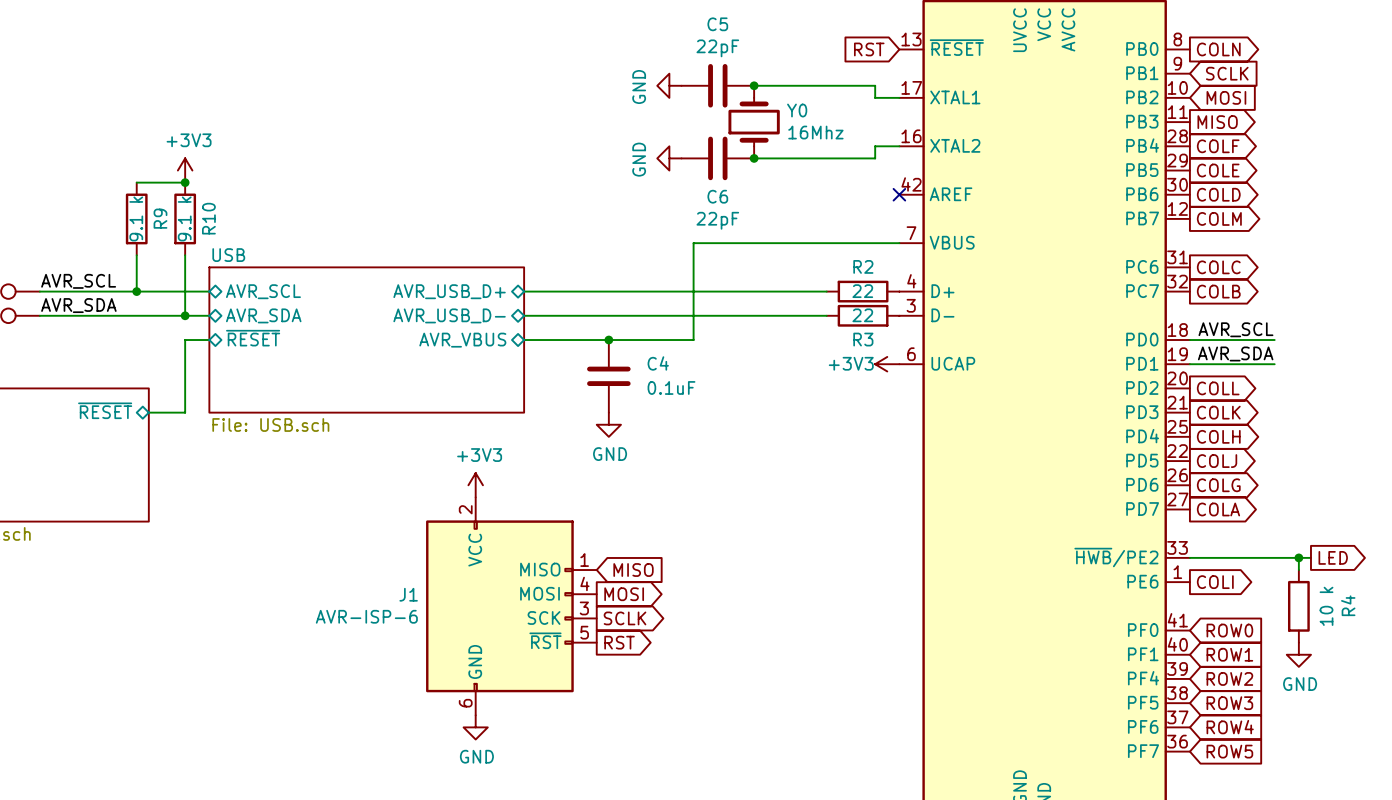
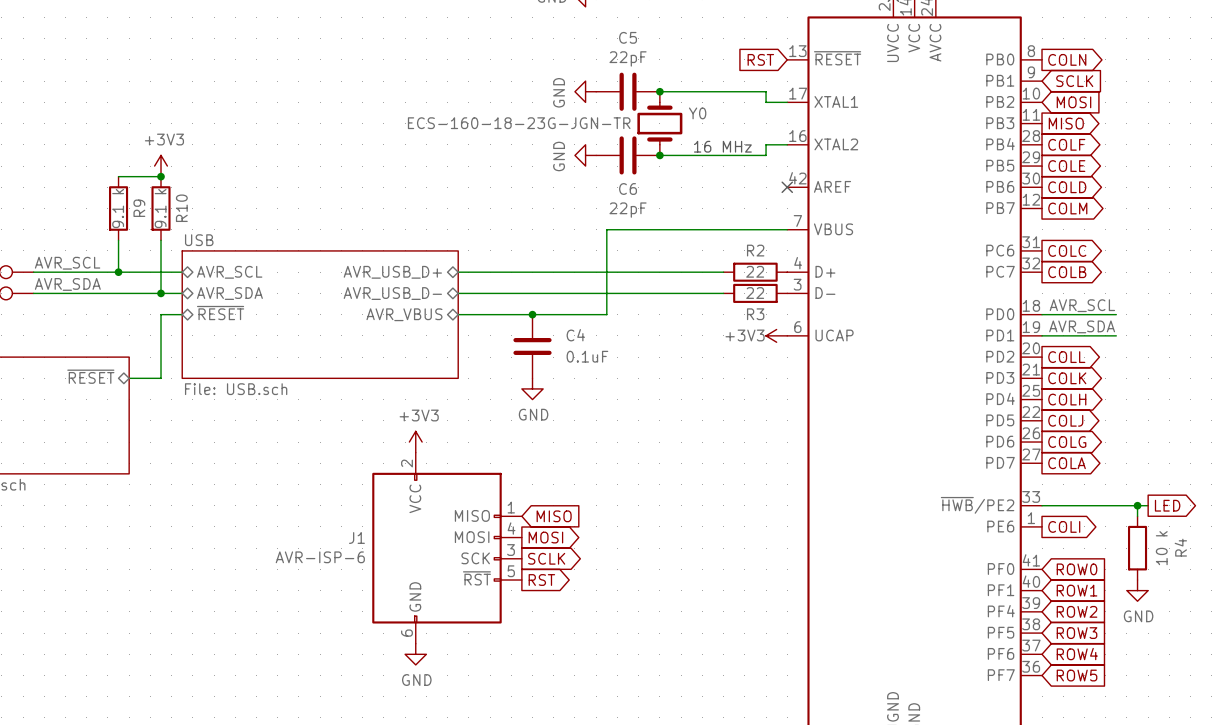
Y0 value: 16Mhz (815, 132) -> ECS-160-18-23G-JGN-TR (519, 123)
text: none -> 16 MHz (722, 146)

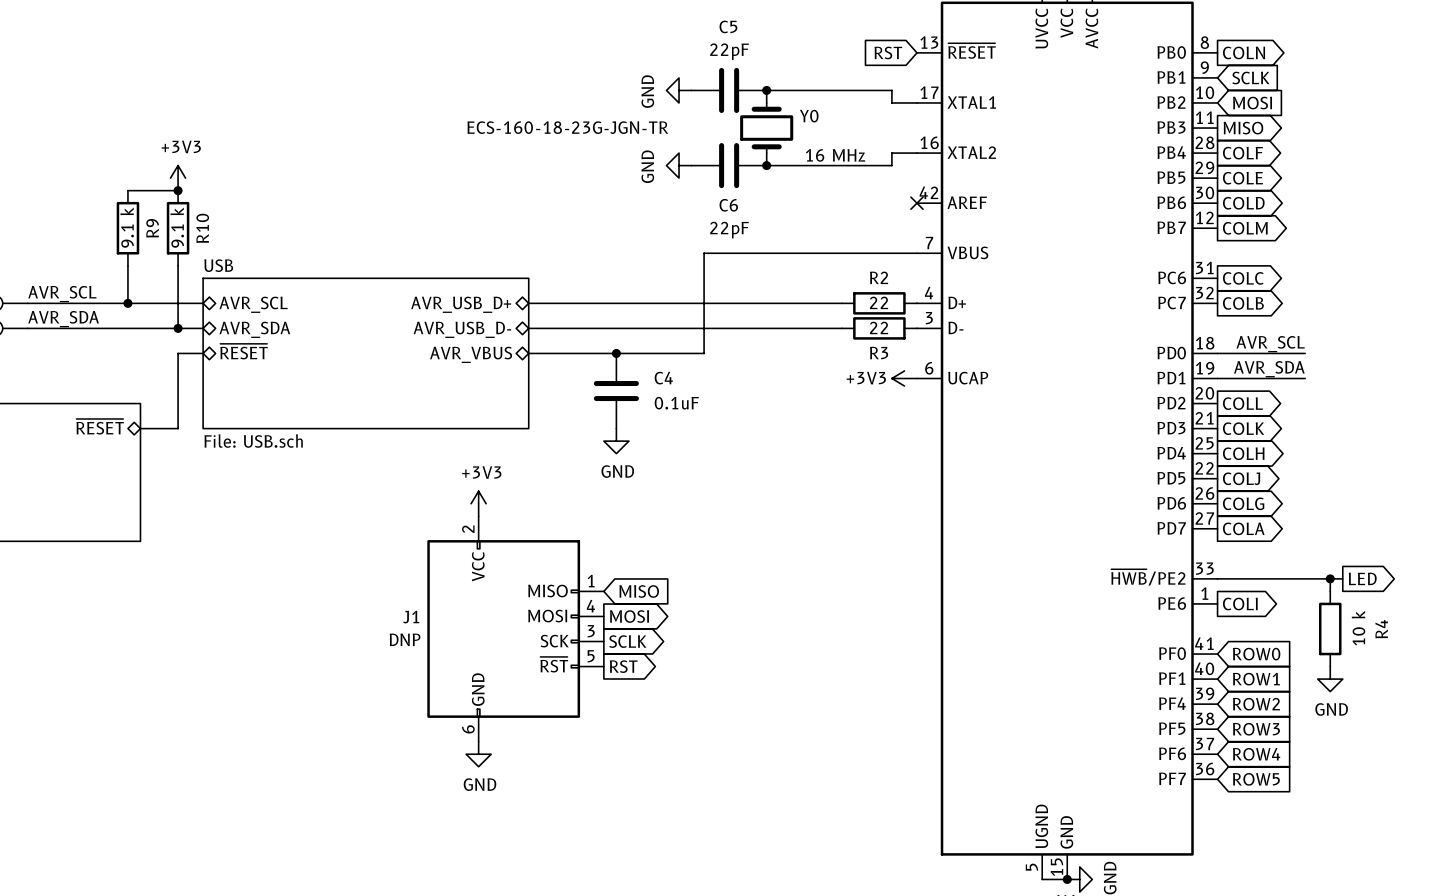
J1 value: AVR-ISP-6 (320, 557) -> DNP (405, 639)

